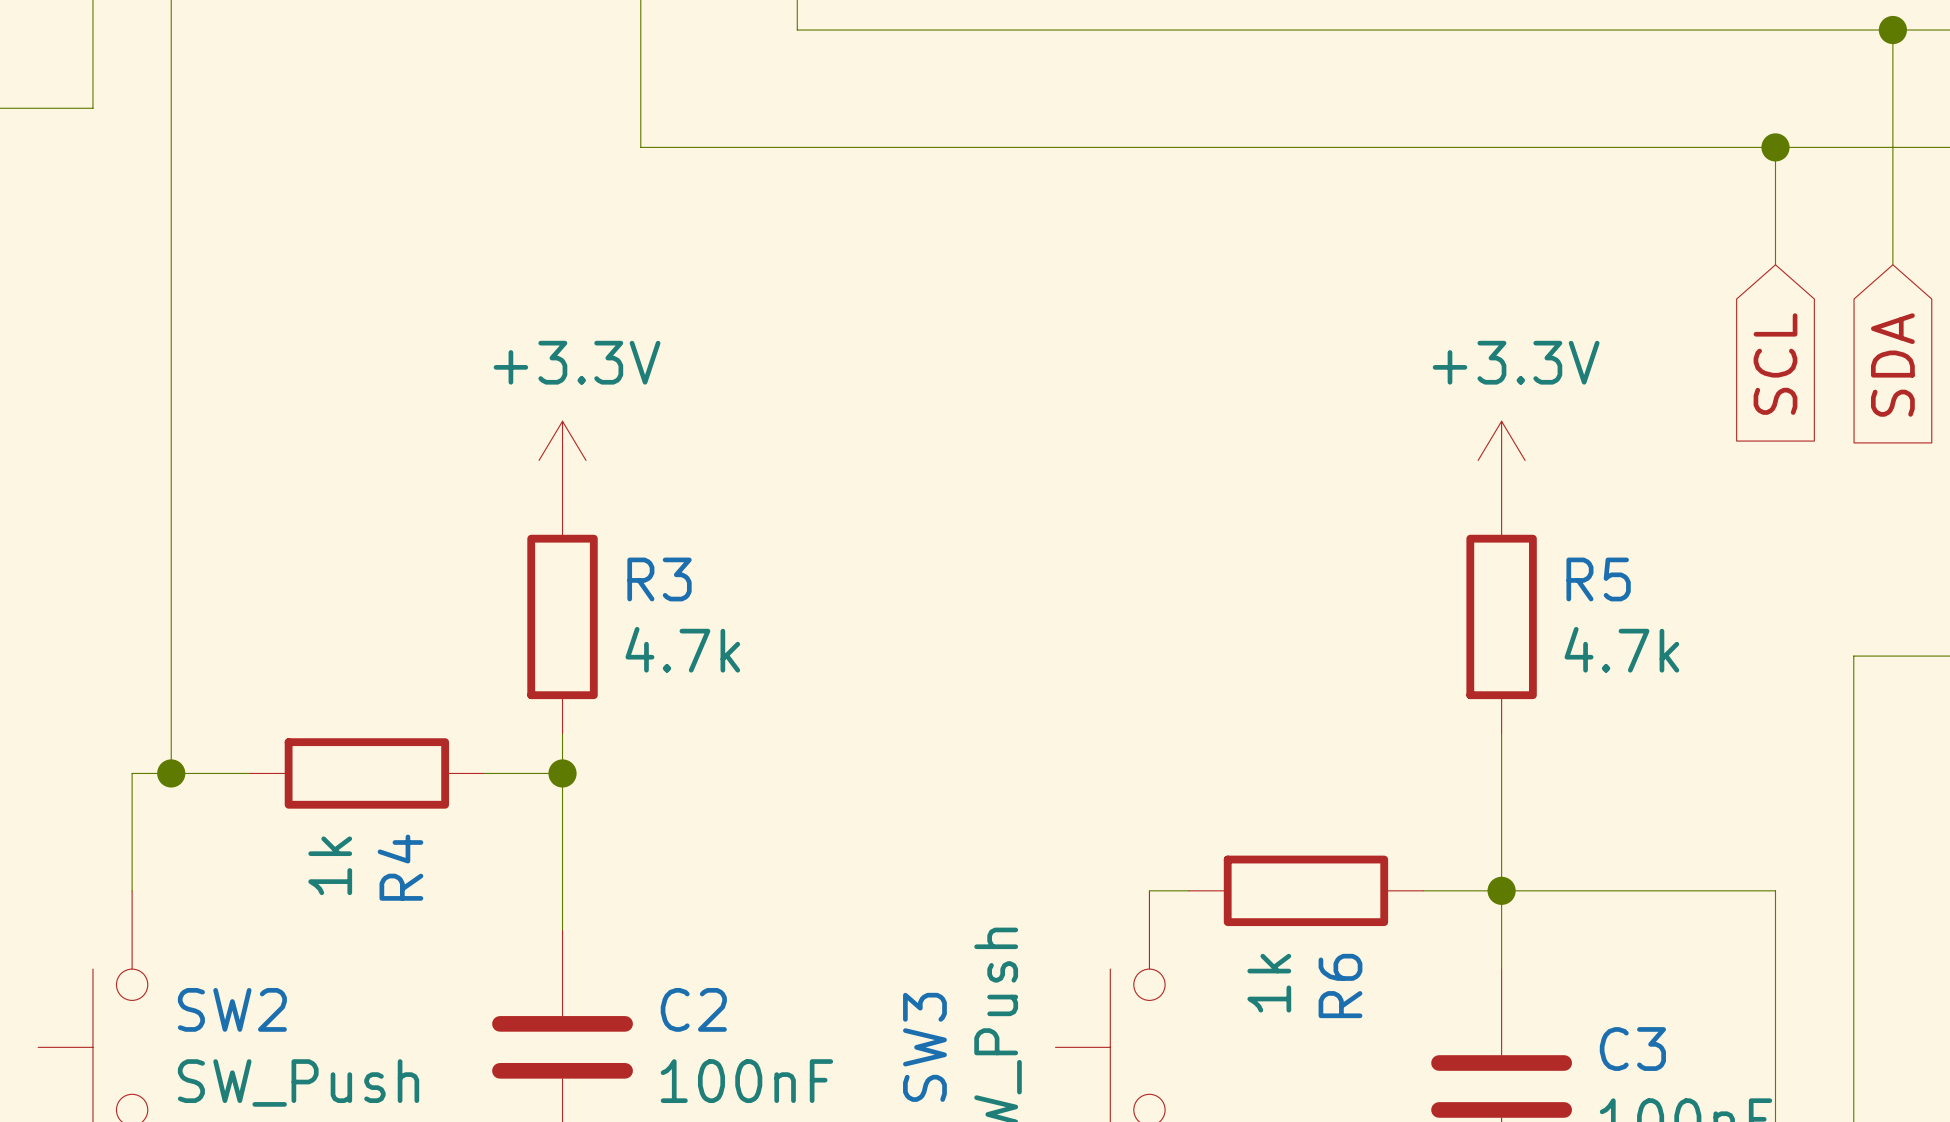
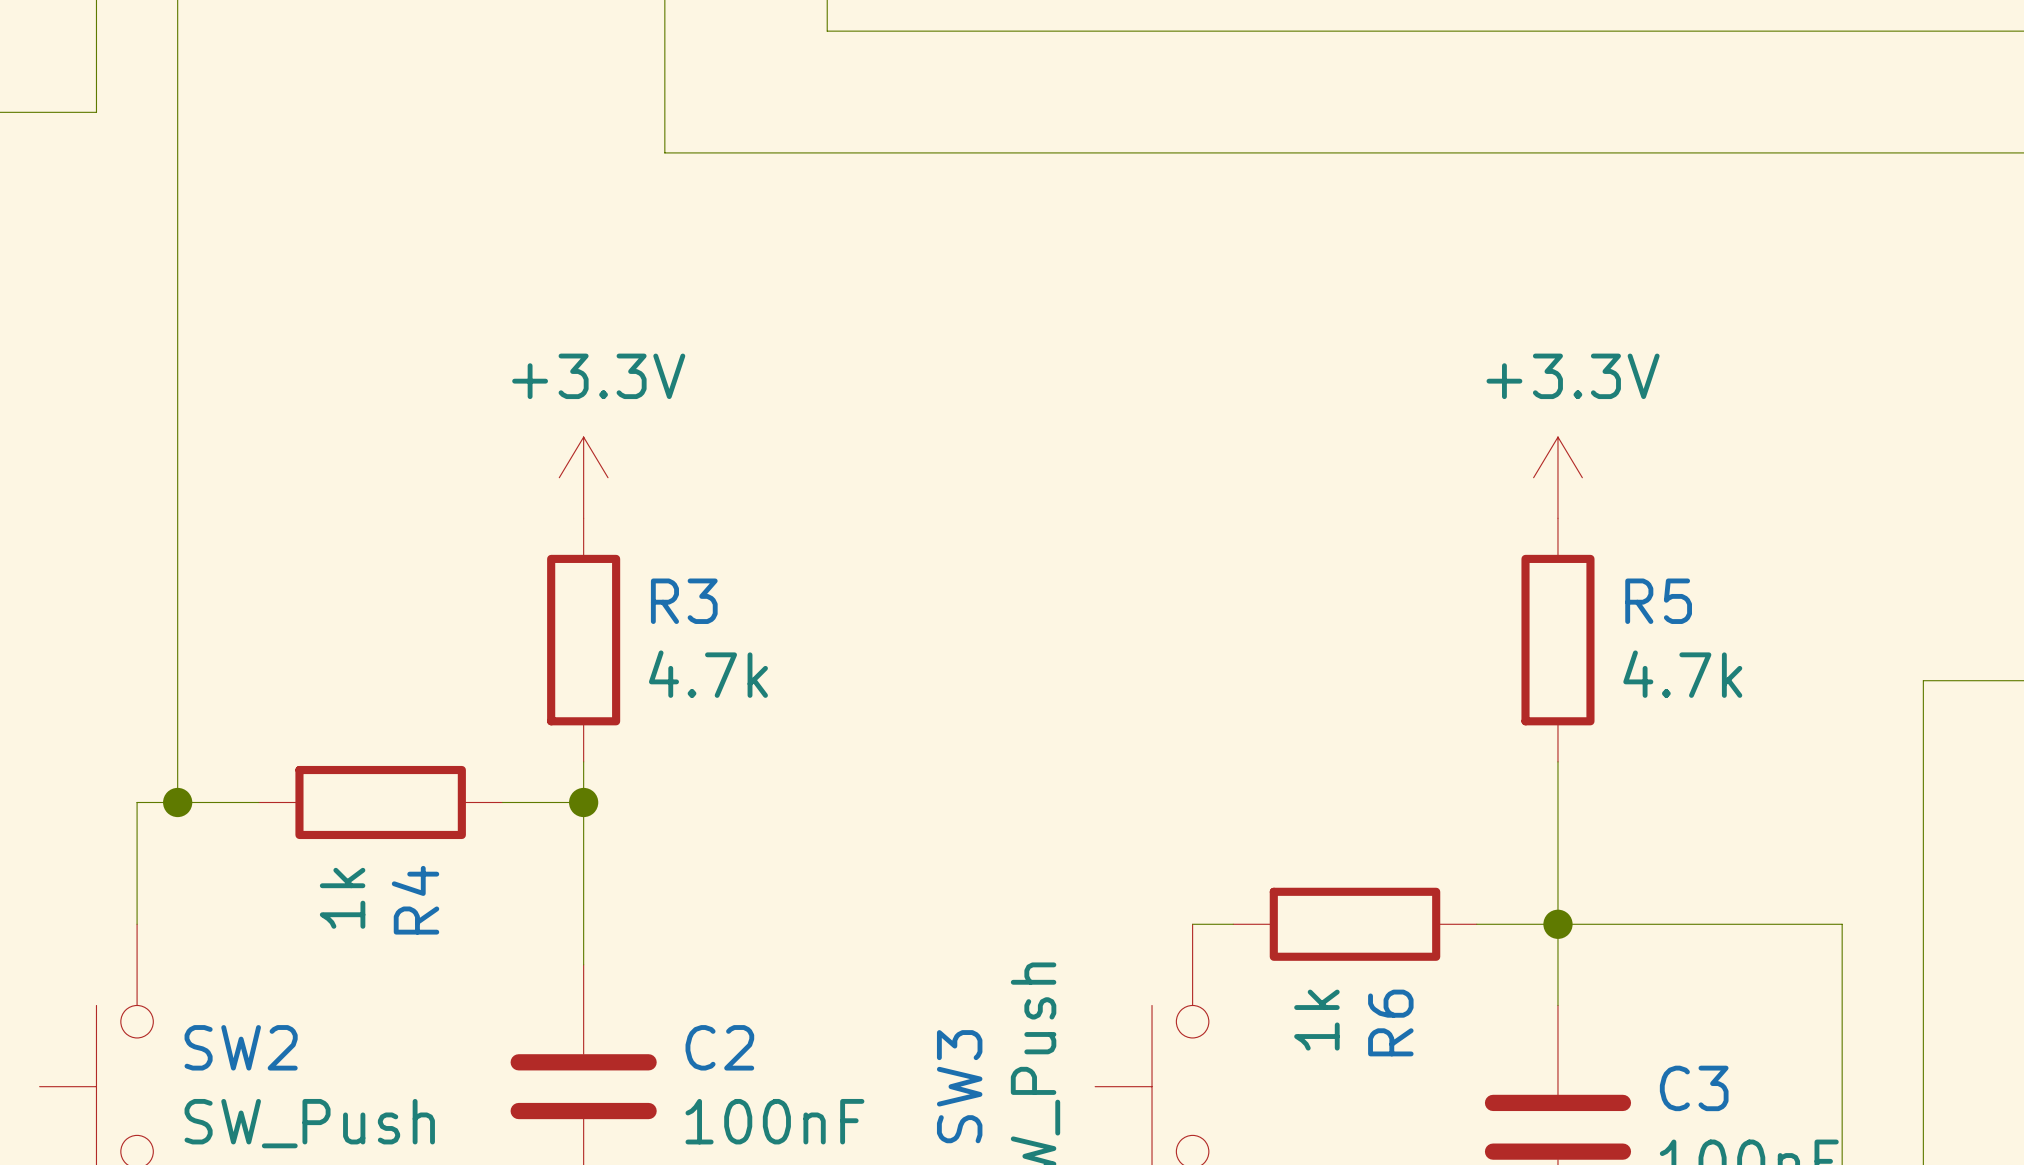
wire: (1892, 30) (1892, 264) -> none
junction: (1892, 30) -> none
wire: (1775, 147) (1775, 264) -> none
junction: (1775, 147) -> none
global label: SCL (1775, 364) -> none
global label: SDA (1892, 364) -> none

